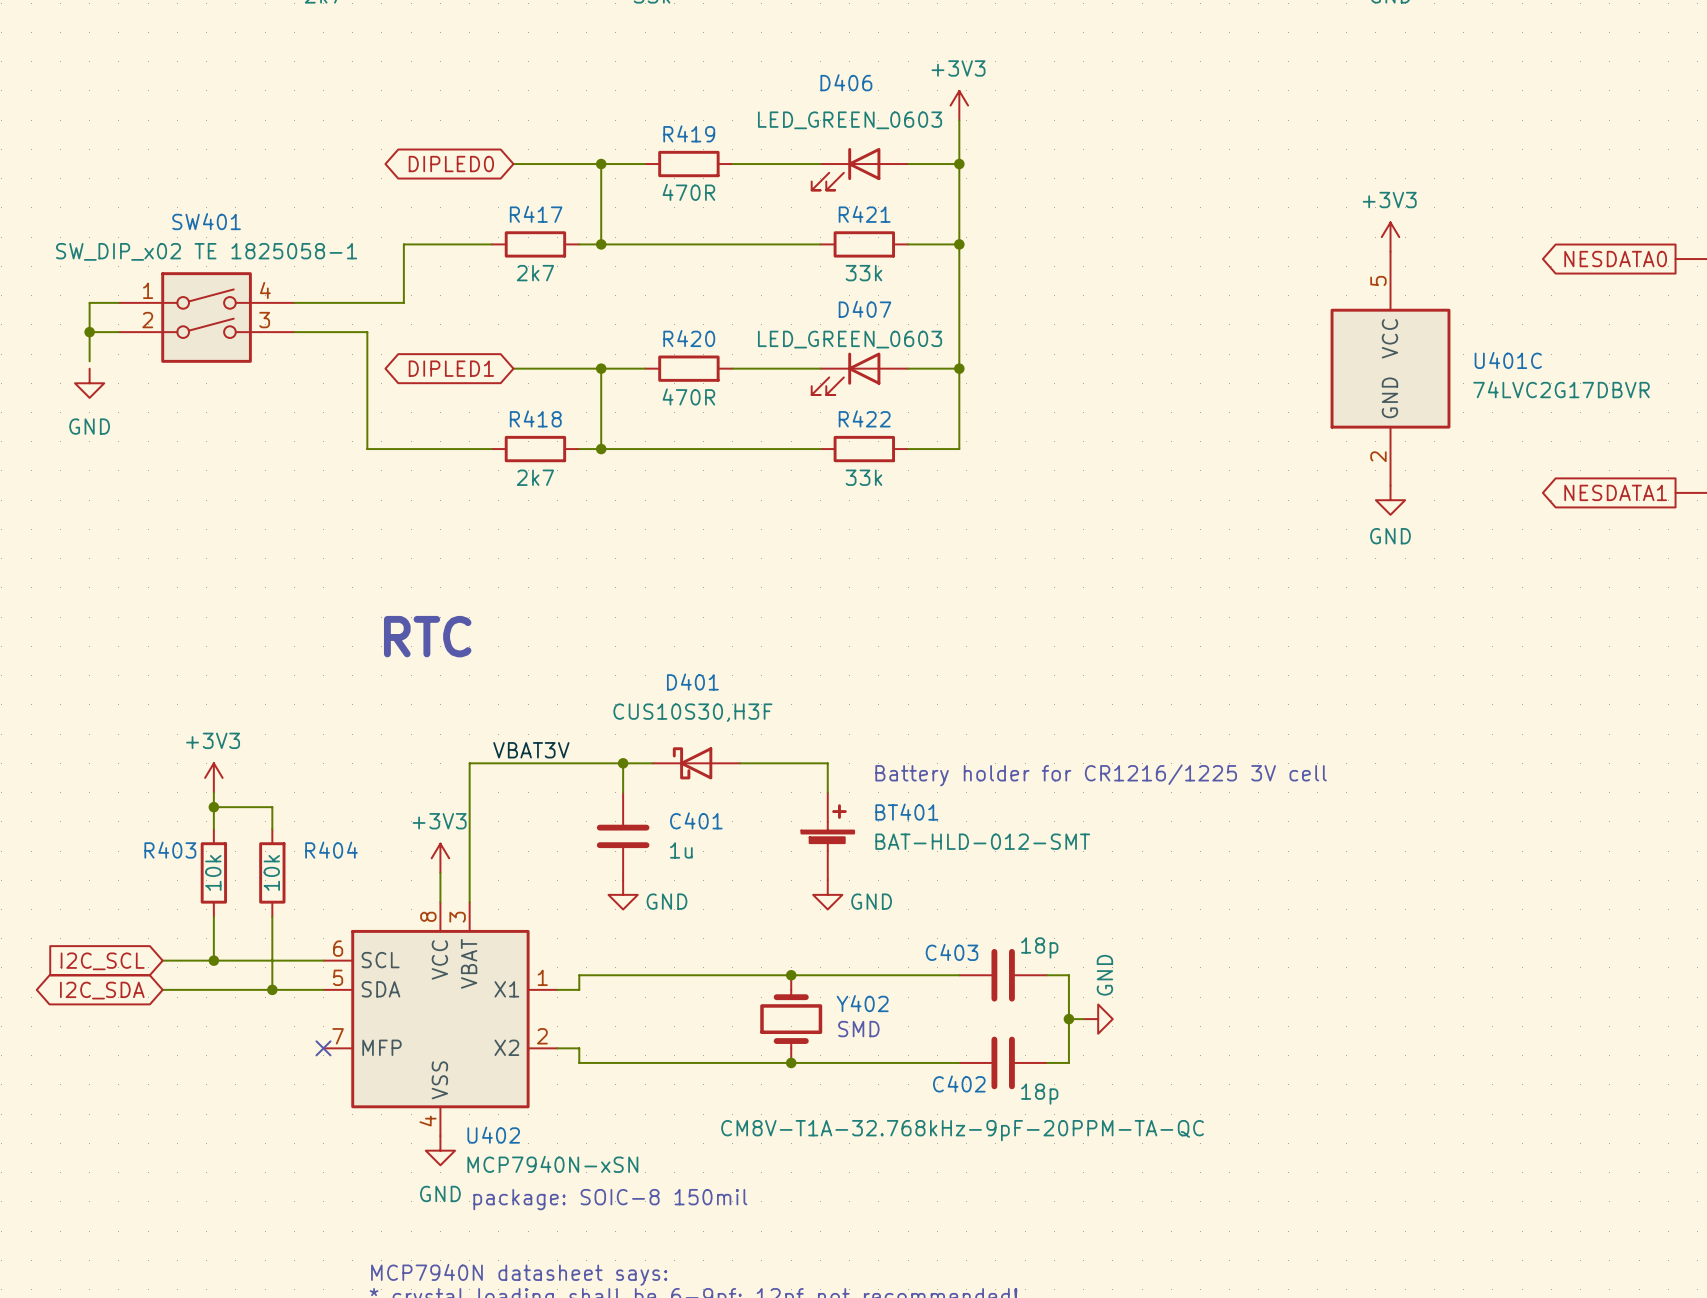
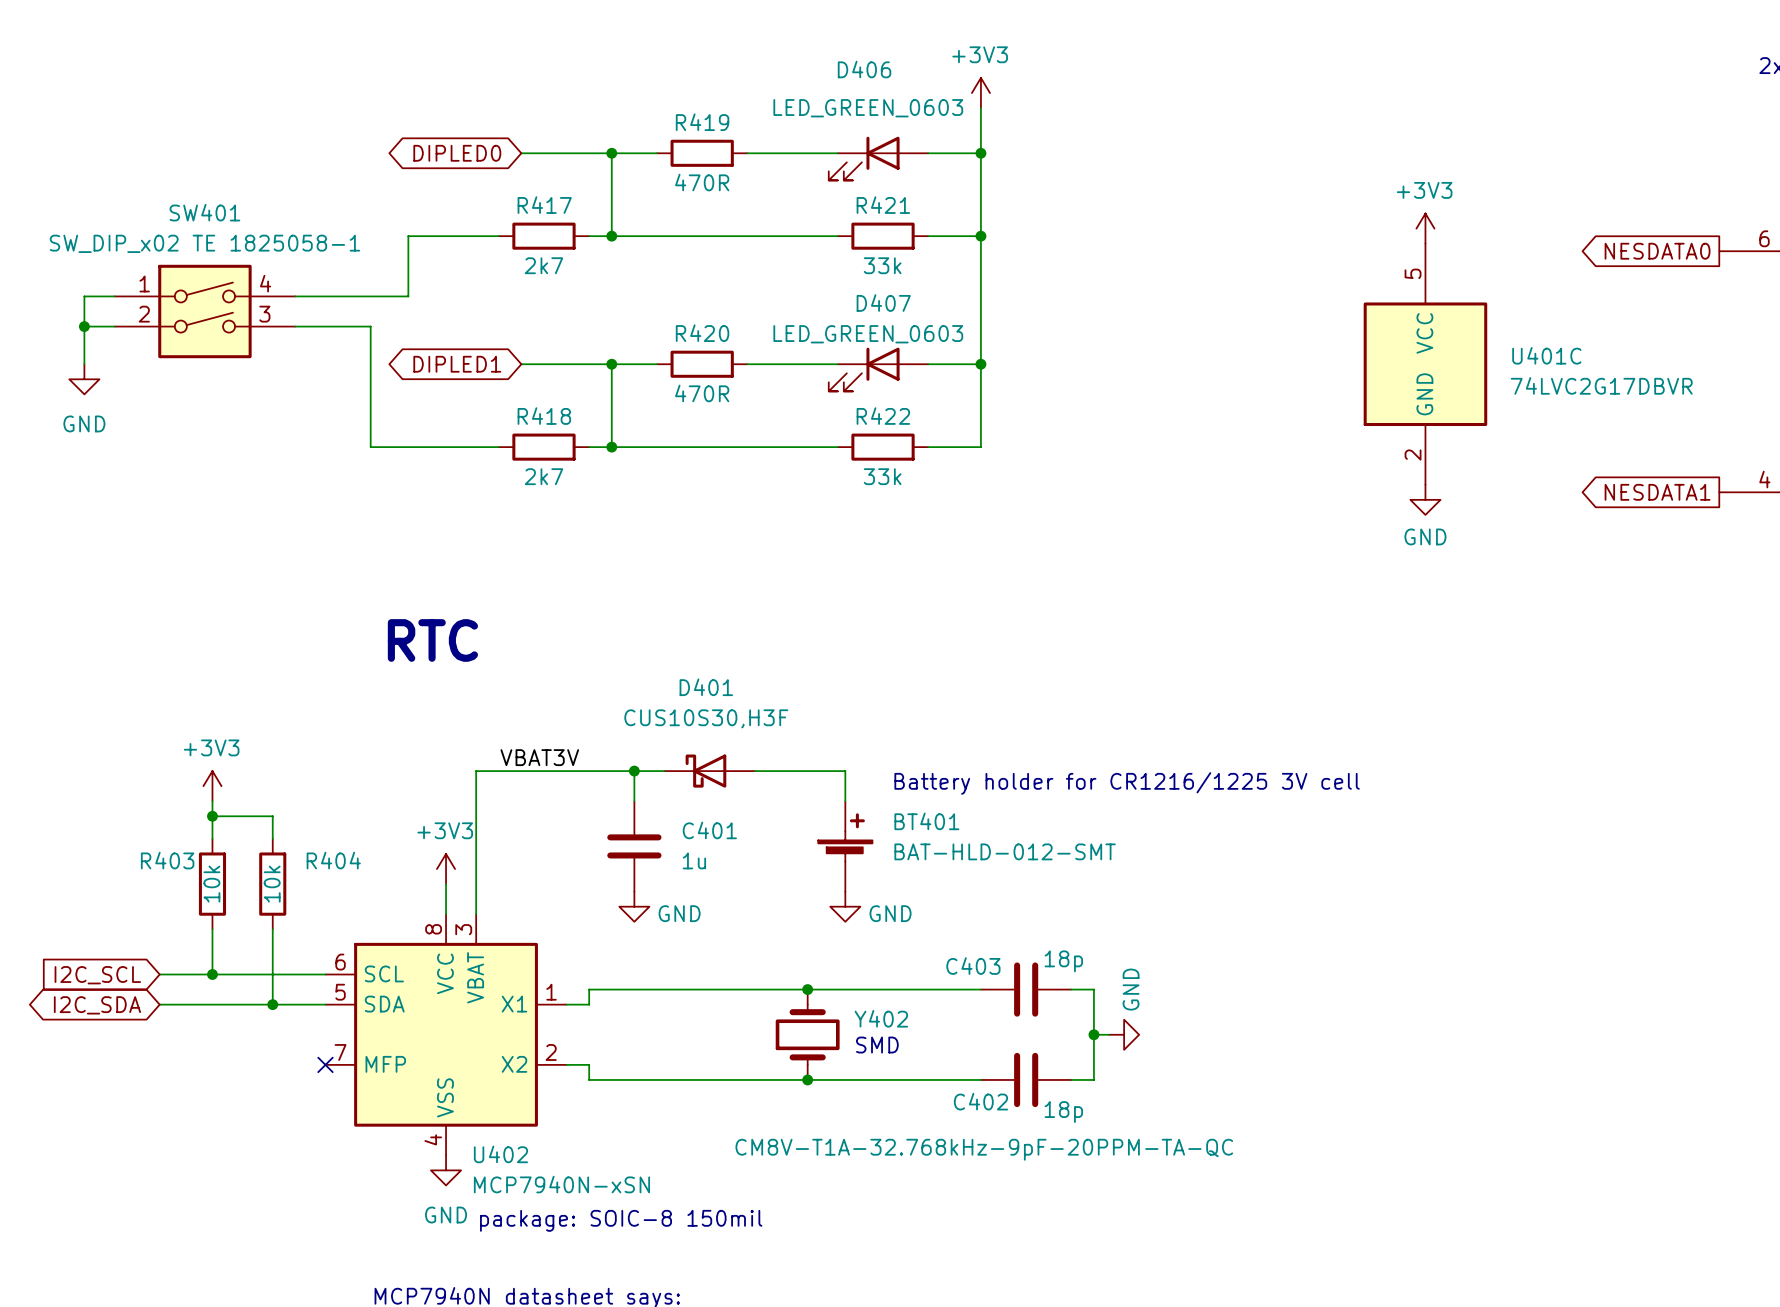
wire: none -> (84, 356) (84, 364)

